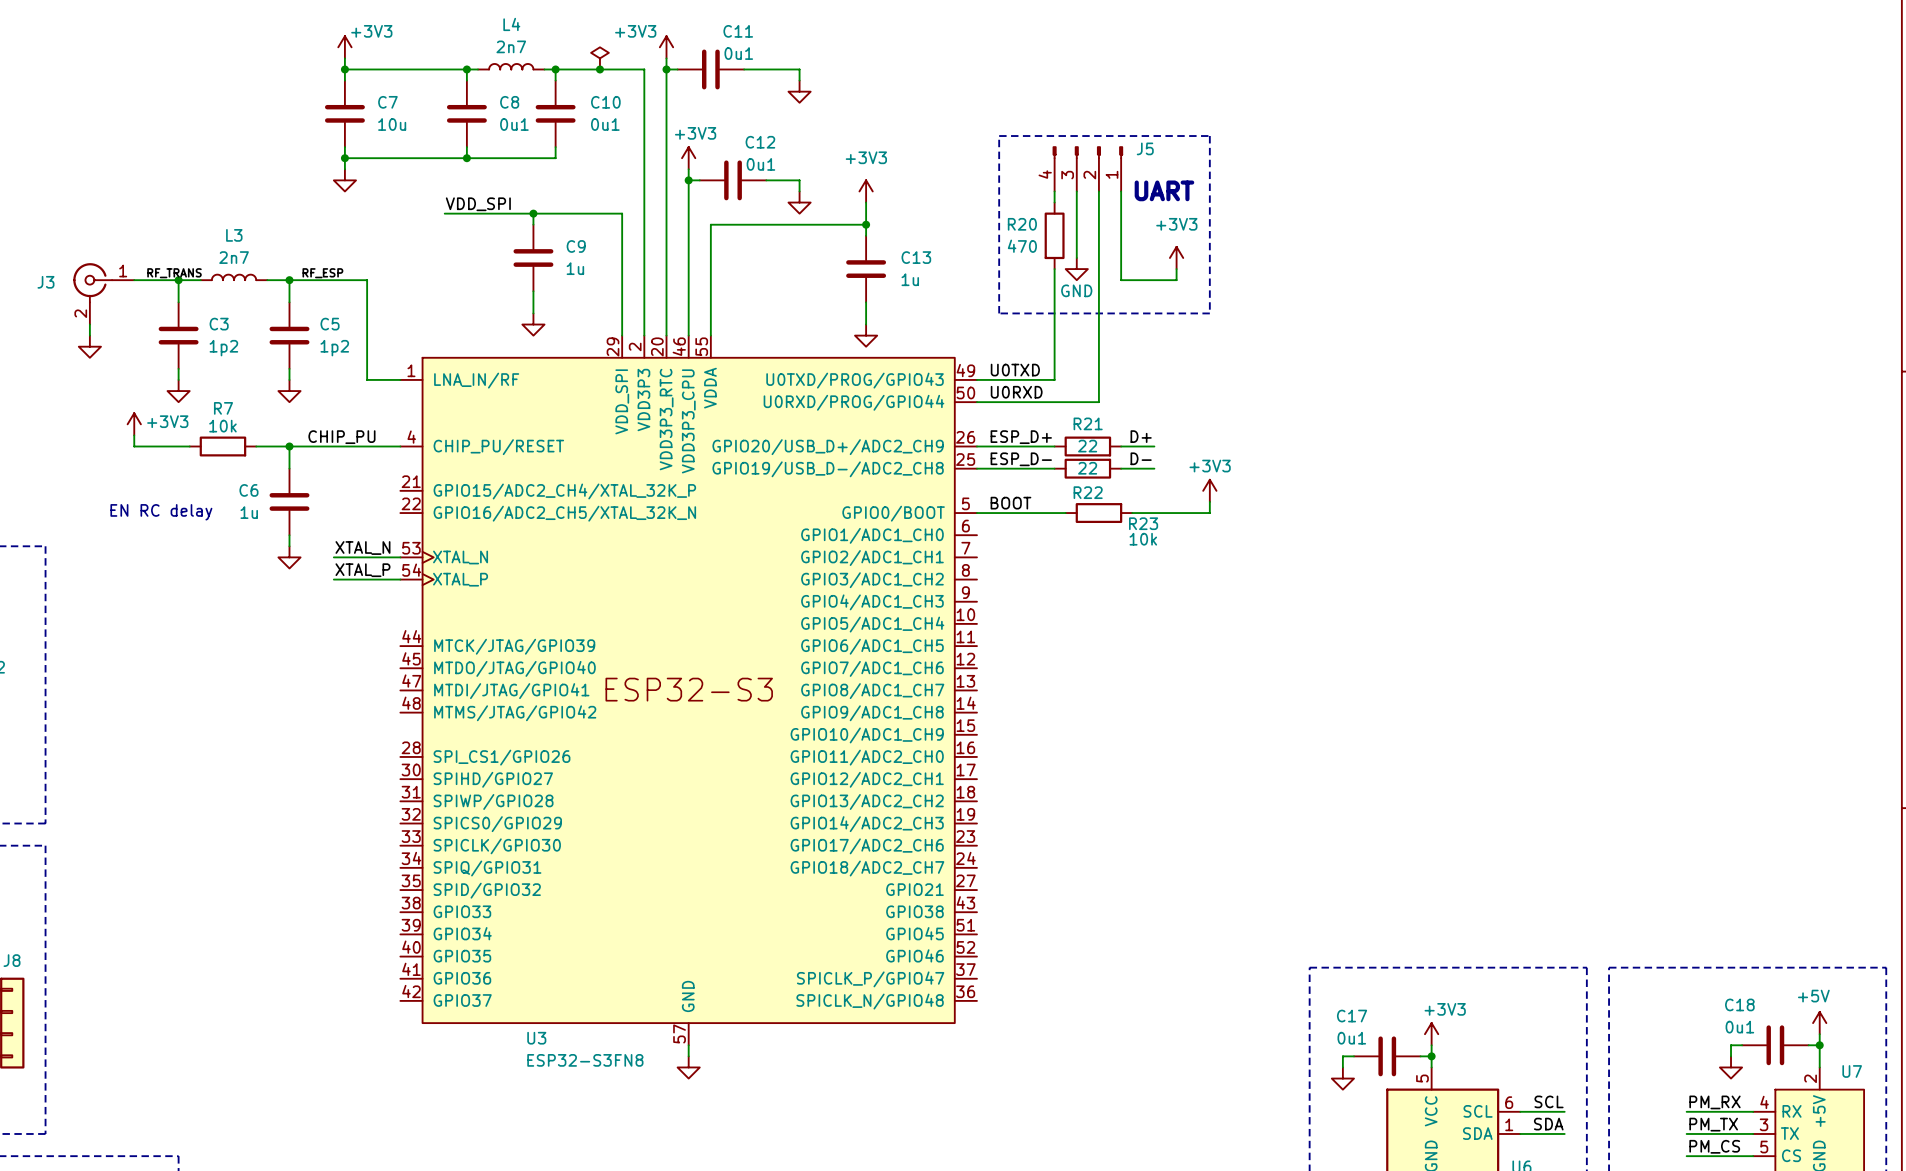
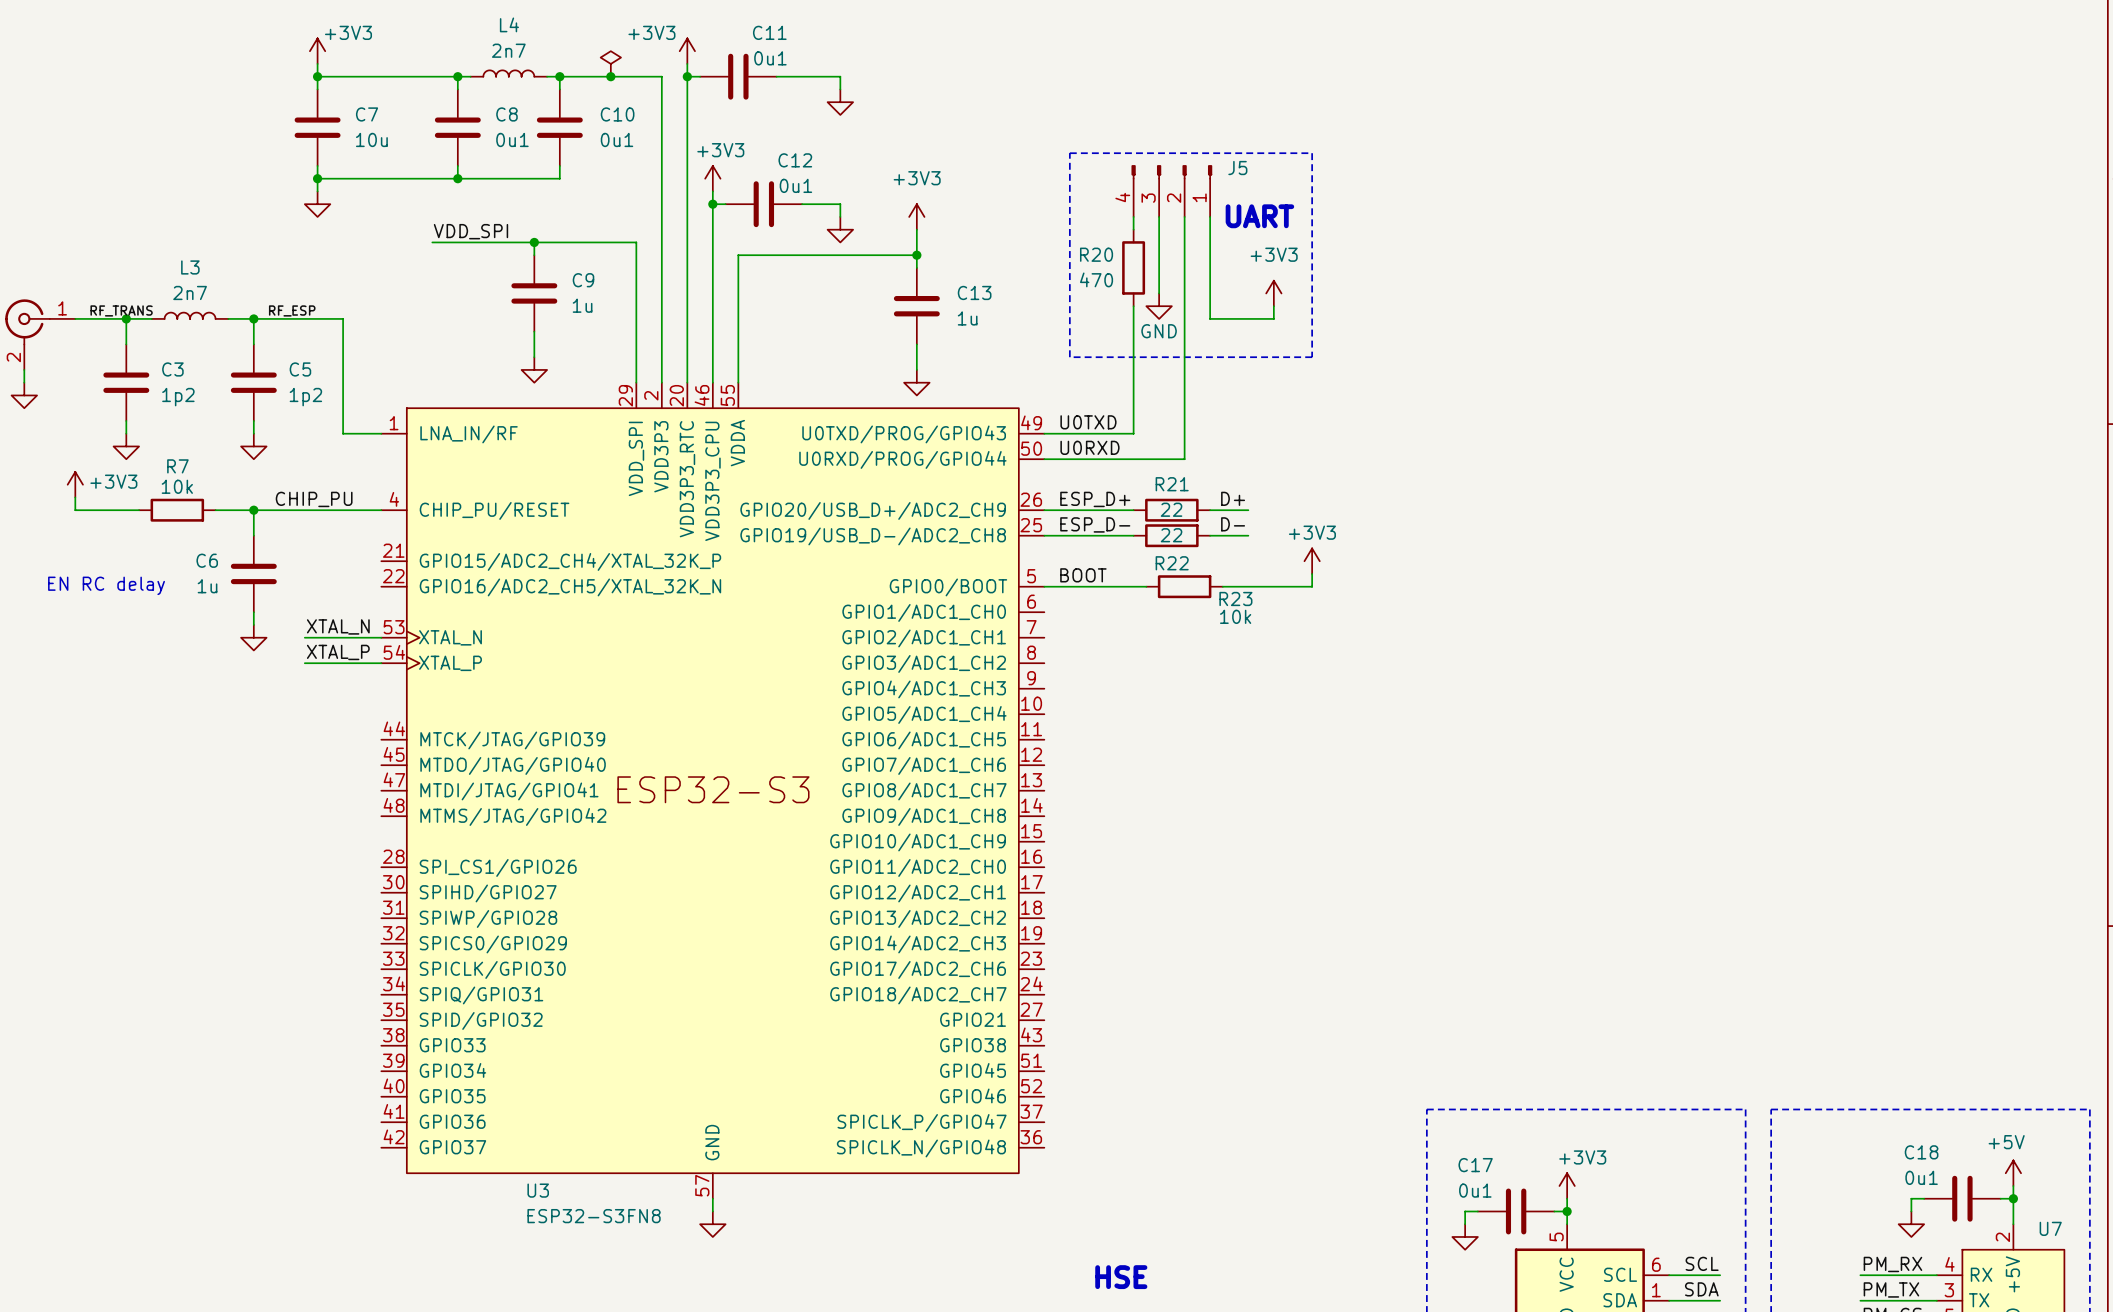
text: none -> HSE (1121, 1277)

